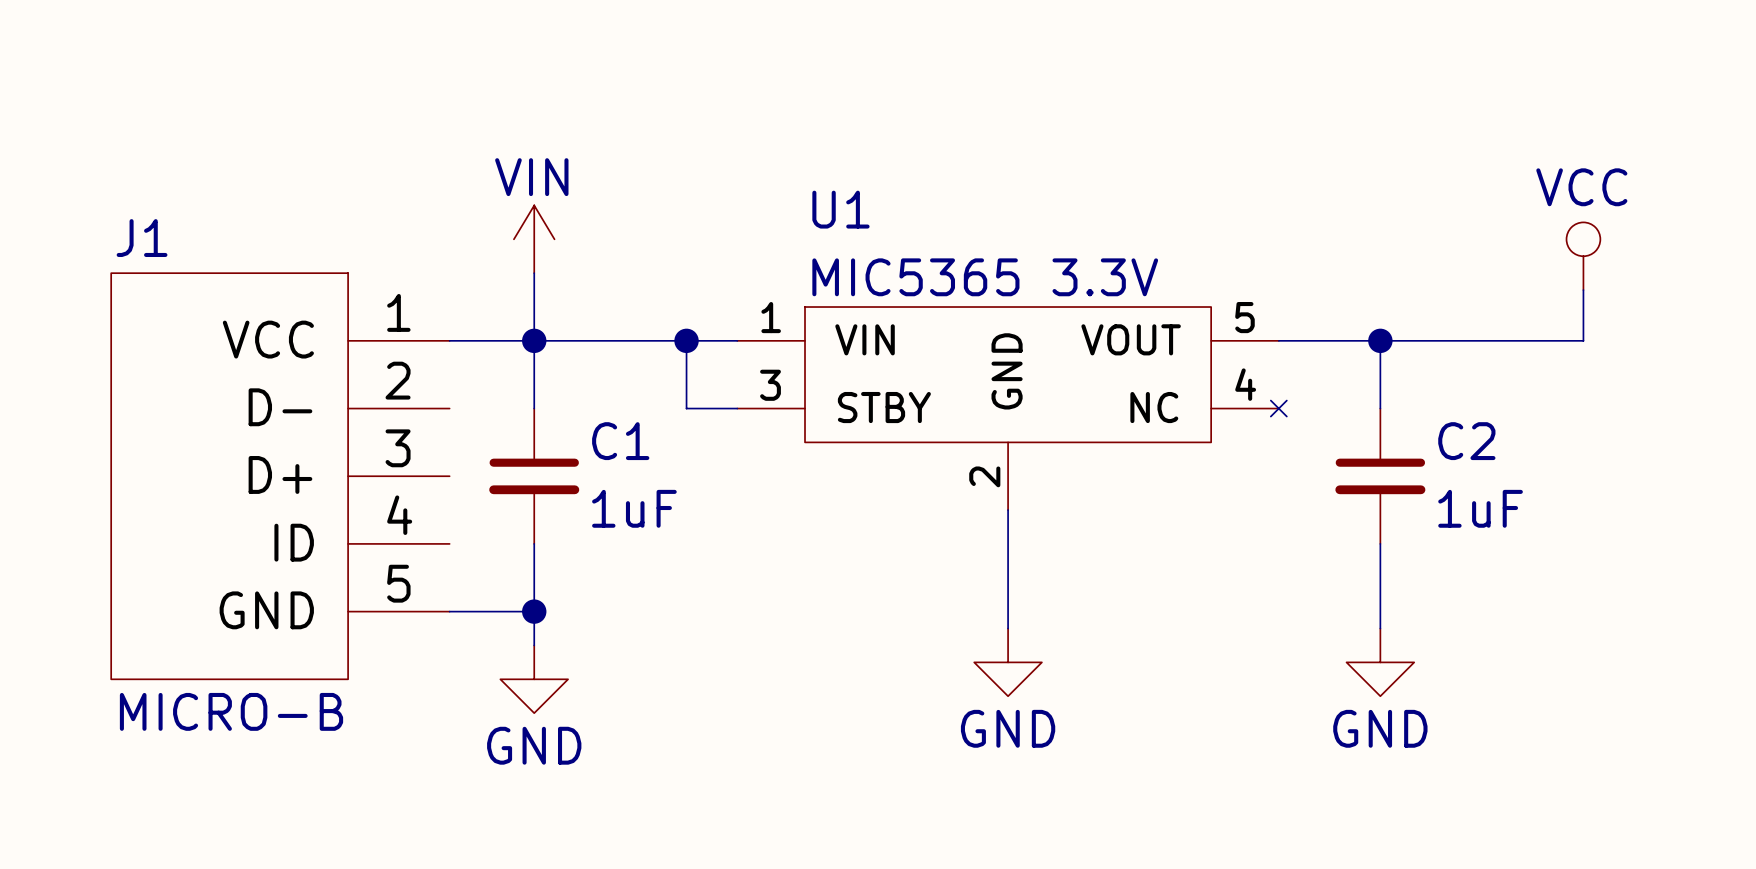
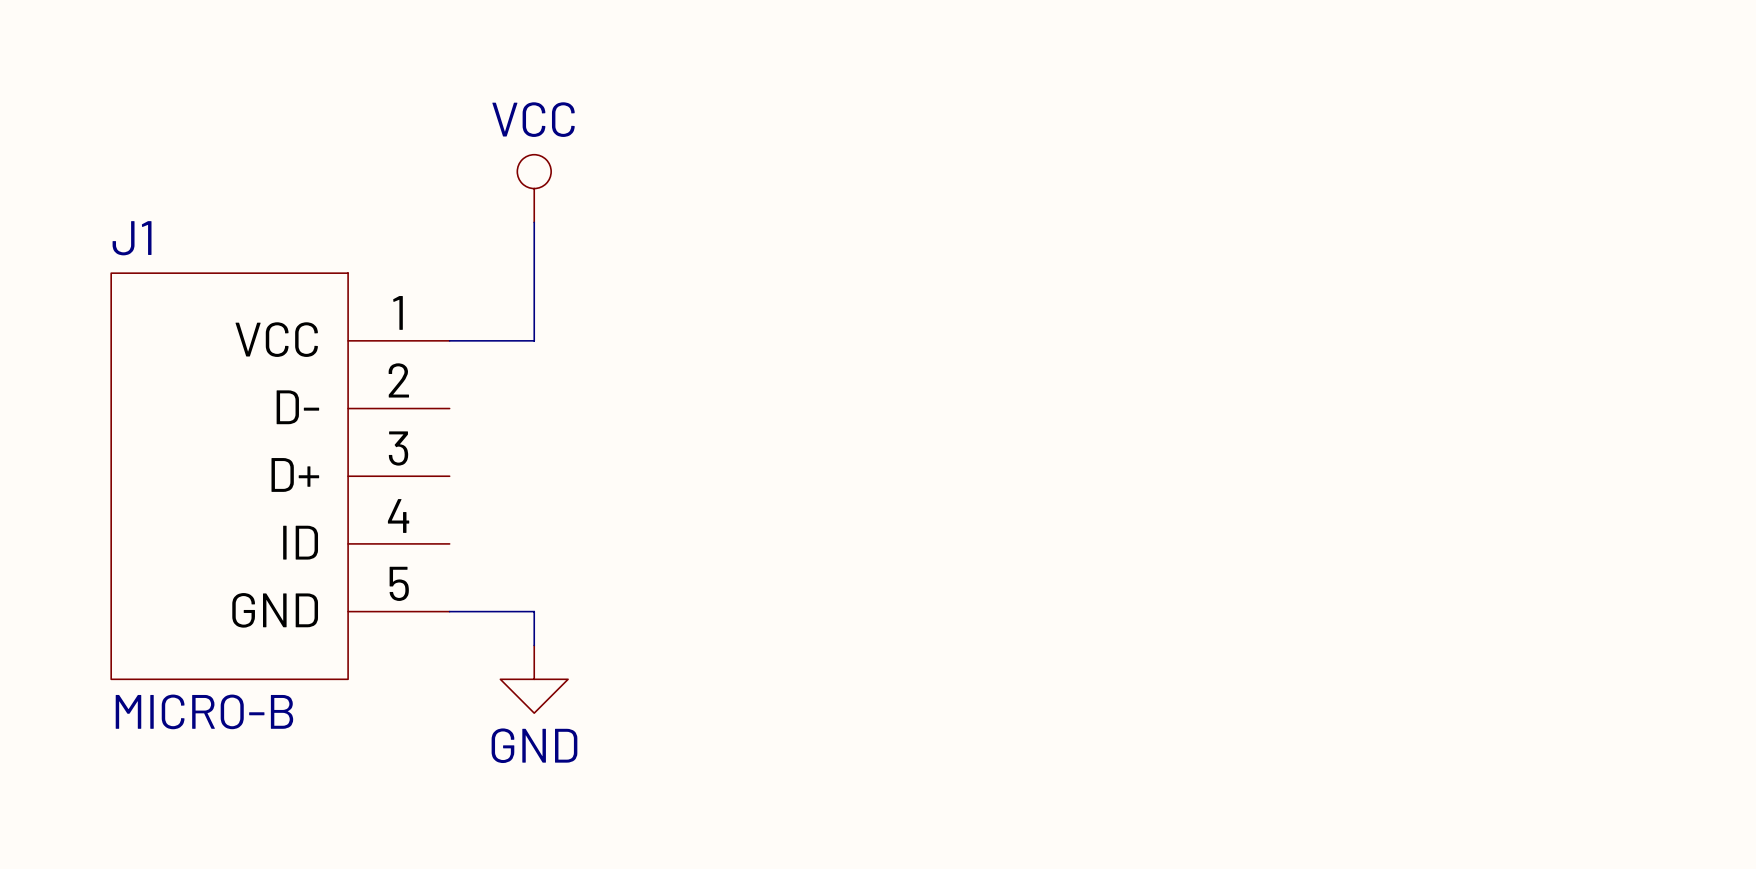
power symbol: none -> VCC (534, 188)
power symbol: VIN (534, 239) -> none
power symbol: VCC (1583, 256) -> none
wire: (1583, 290) (1583, 340) (1278, 340) -> none
junction: (534, 340) -> none
wire: (686, 340) (686, 408) (737, 408) -> none
junction: (686, 340) -> none
wire: (737, 340) (534, 340) (534, 408) -> none
wire: (1380, 340) (1380, 408) -> none
junction: (1380, 340) -> none
U1: MIC5365 3.3V (1012, 408) -> none
C1: 1uF (534, 476) -> none
C2: 1uF (1380, 476) -> none
wire: (1008, 510) (1008, 628) -> none
wire: (534, 543) (534, 611) -> none
wire: (1380, 543) (1380, 628) -> none
junction: (534, 611) -> none
power symbol: GND (1008, 662) -> none
power symbol: GND (1380, 662) -> none

